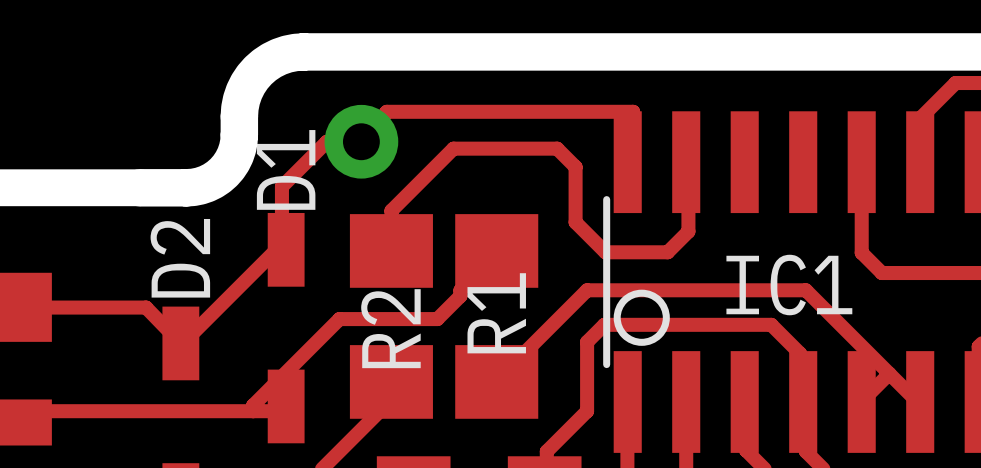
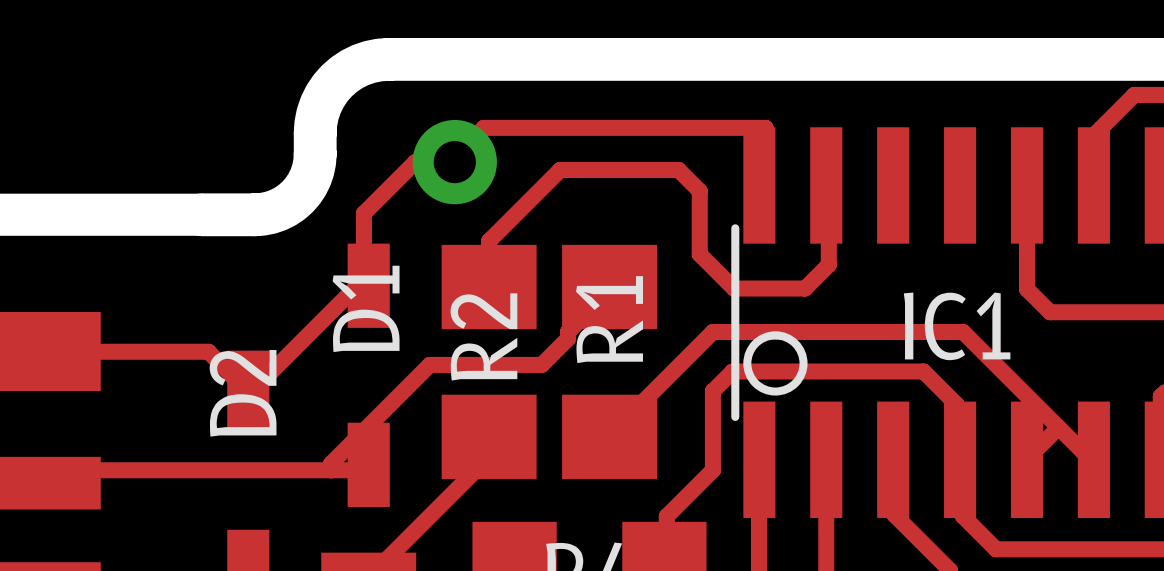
D1 name position: D1 (286, 169) -> D1 (366, 308)
D2 name position: D2 (180, 258) -> D2 (243, 393)
R1 name position: R1 (496, 313) -> R1 (609, 319)
R2 name position: R2 (390, 328) -> R2 (483, 336)

